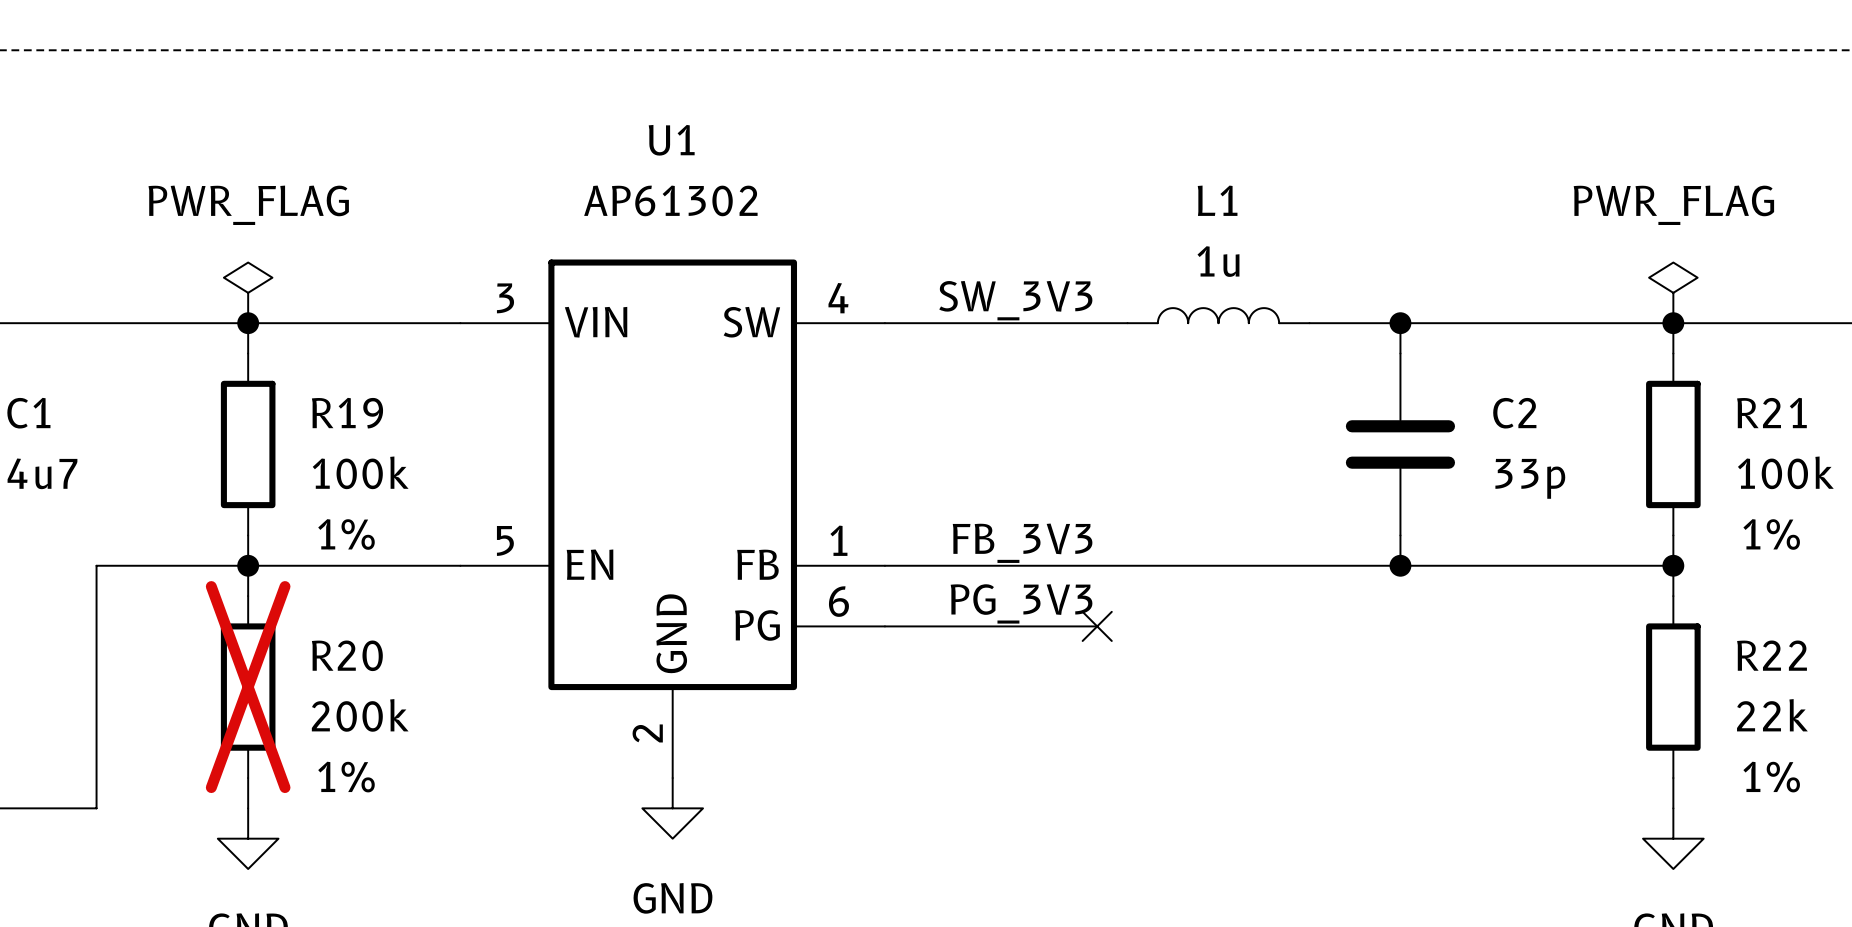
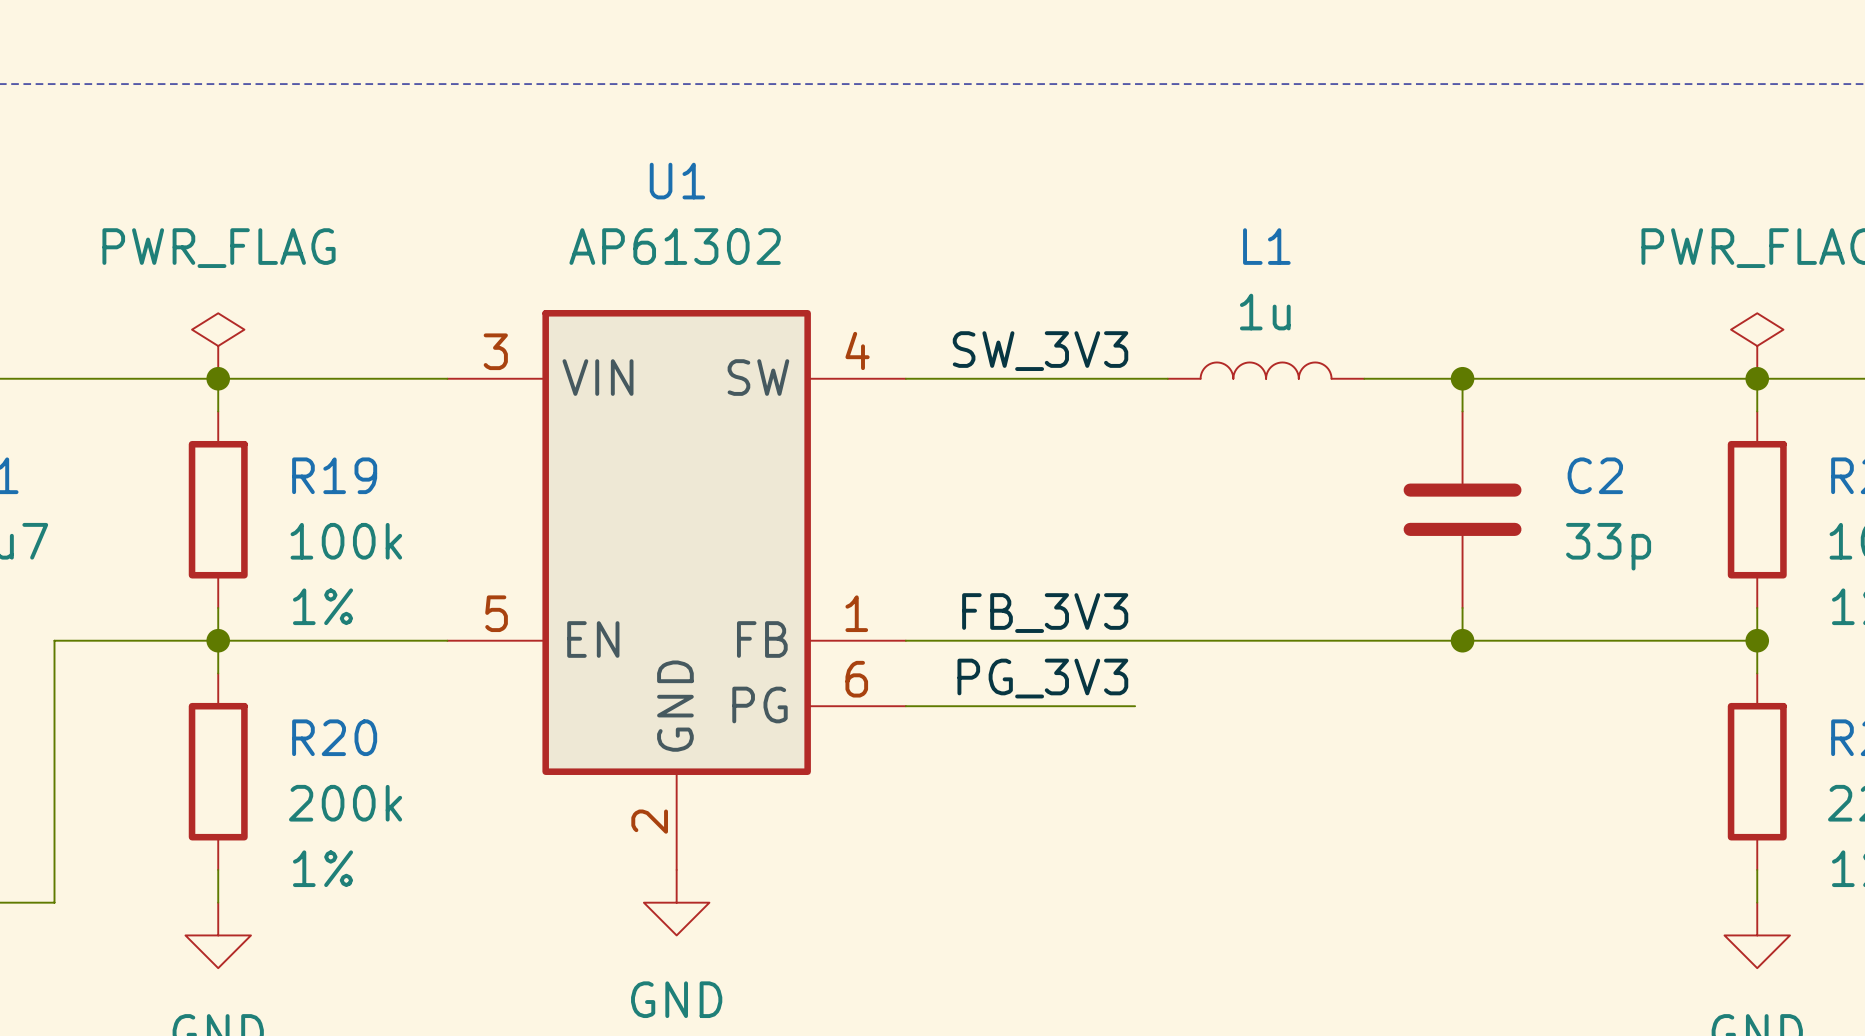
no-connect mark: (1097, 626) -> none
R20 do-not-place cross: (248, 687) -> none

